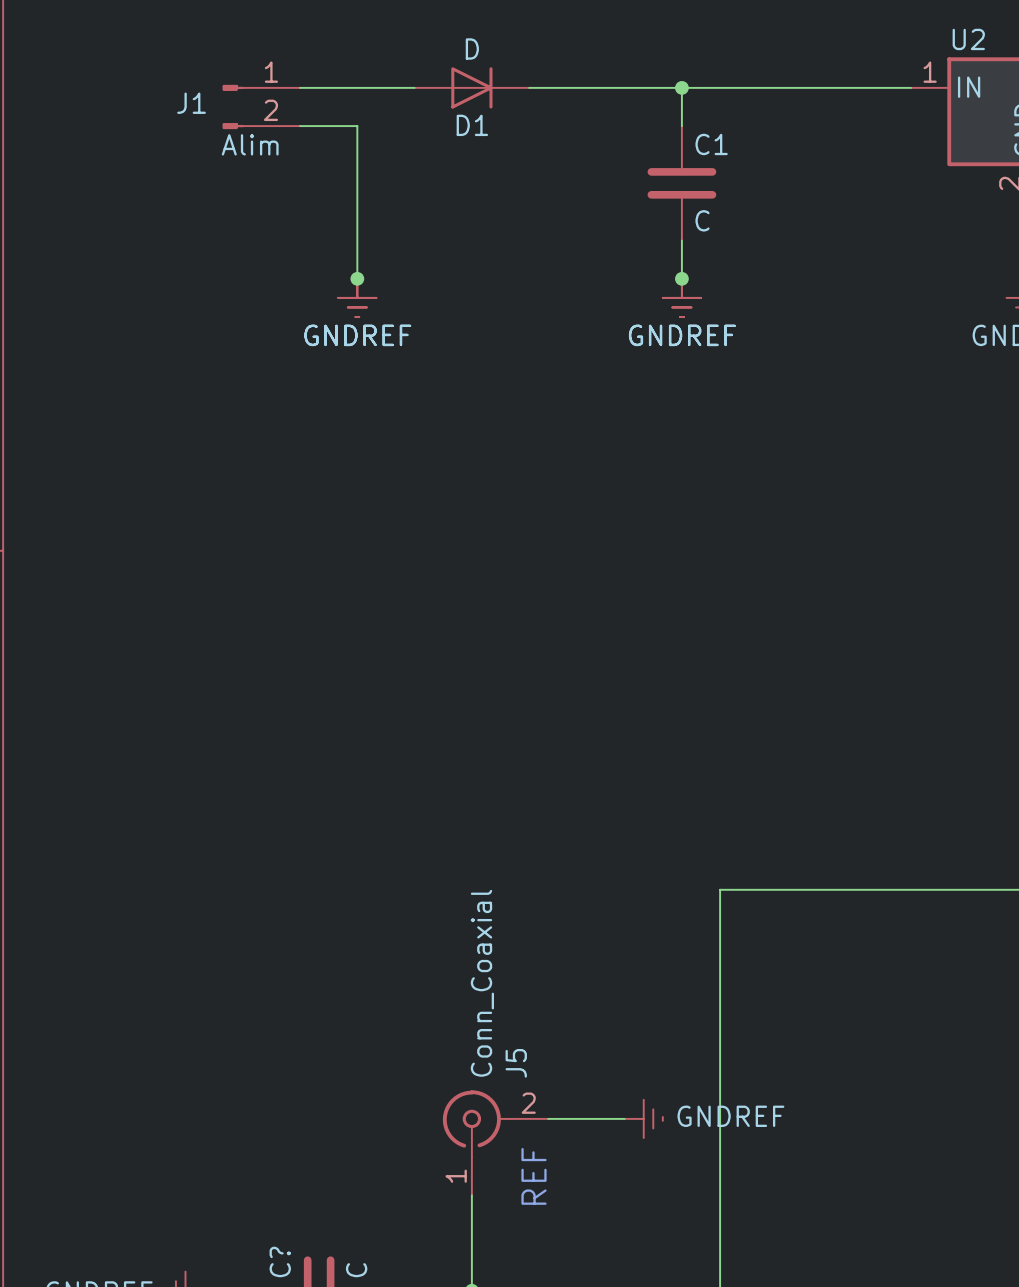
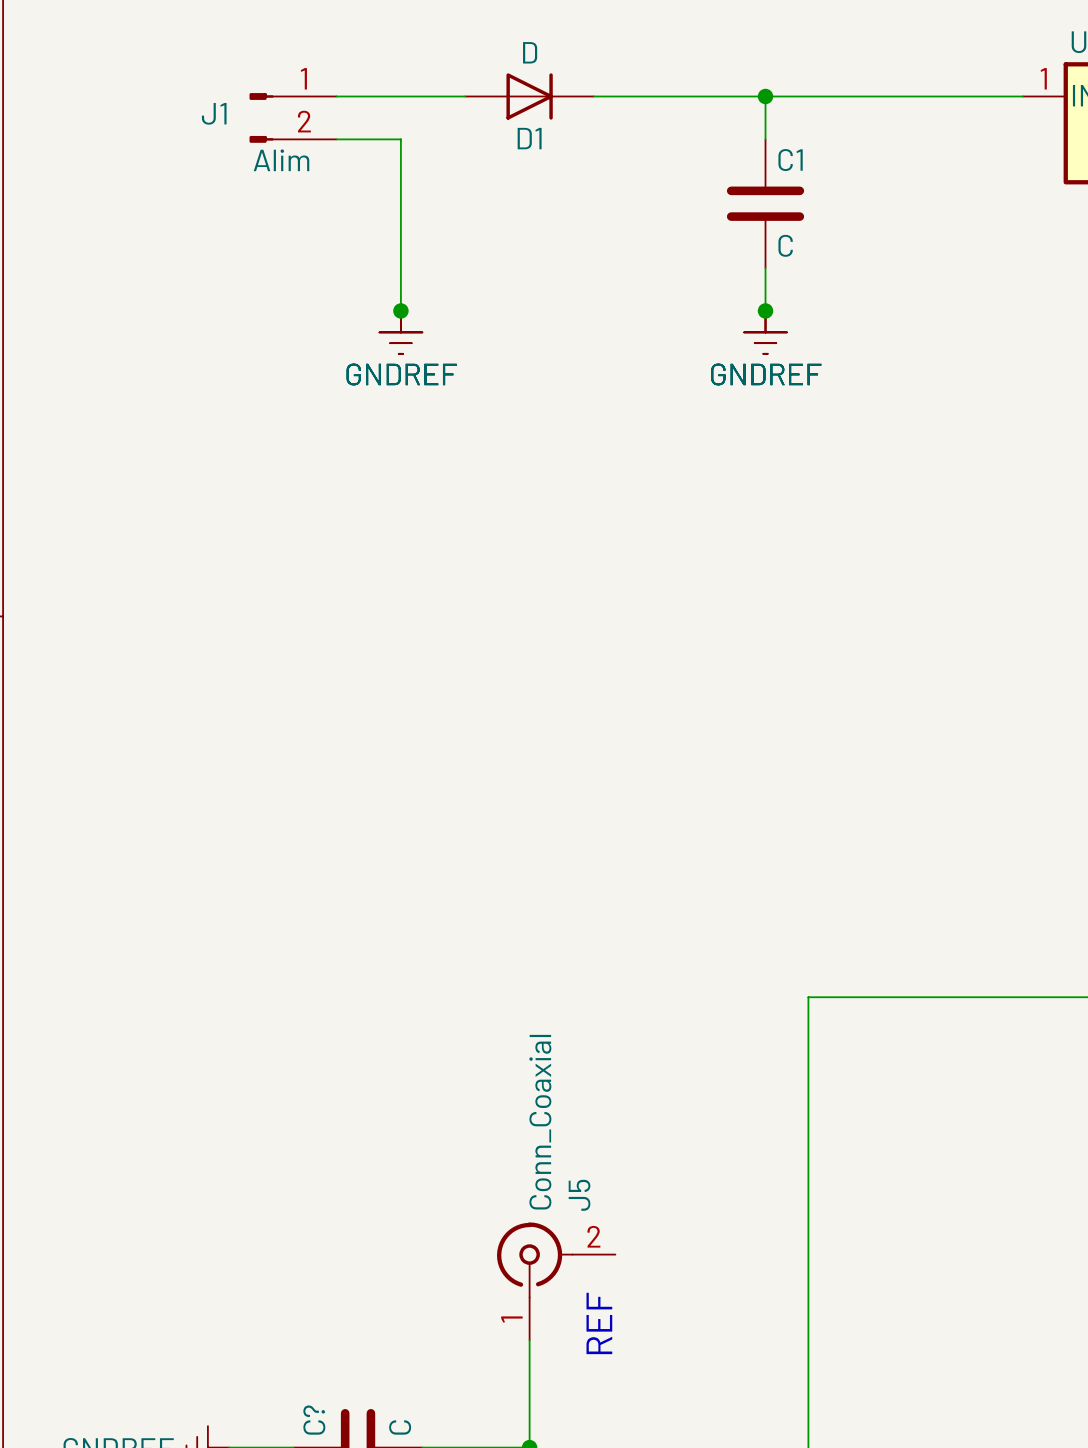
wire: (548, 1118) (624, 1118) -> none
power symbol: GNDREF (643, 1118) -> none

